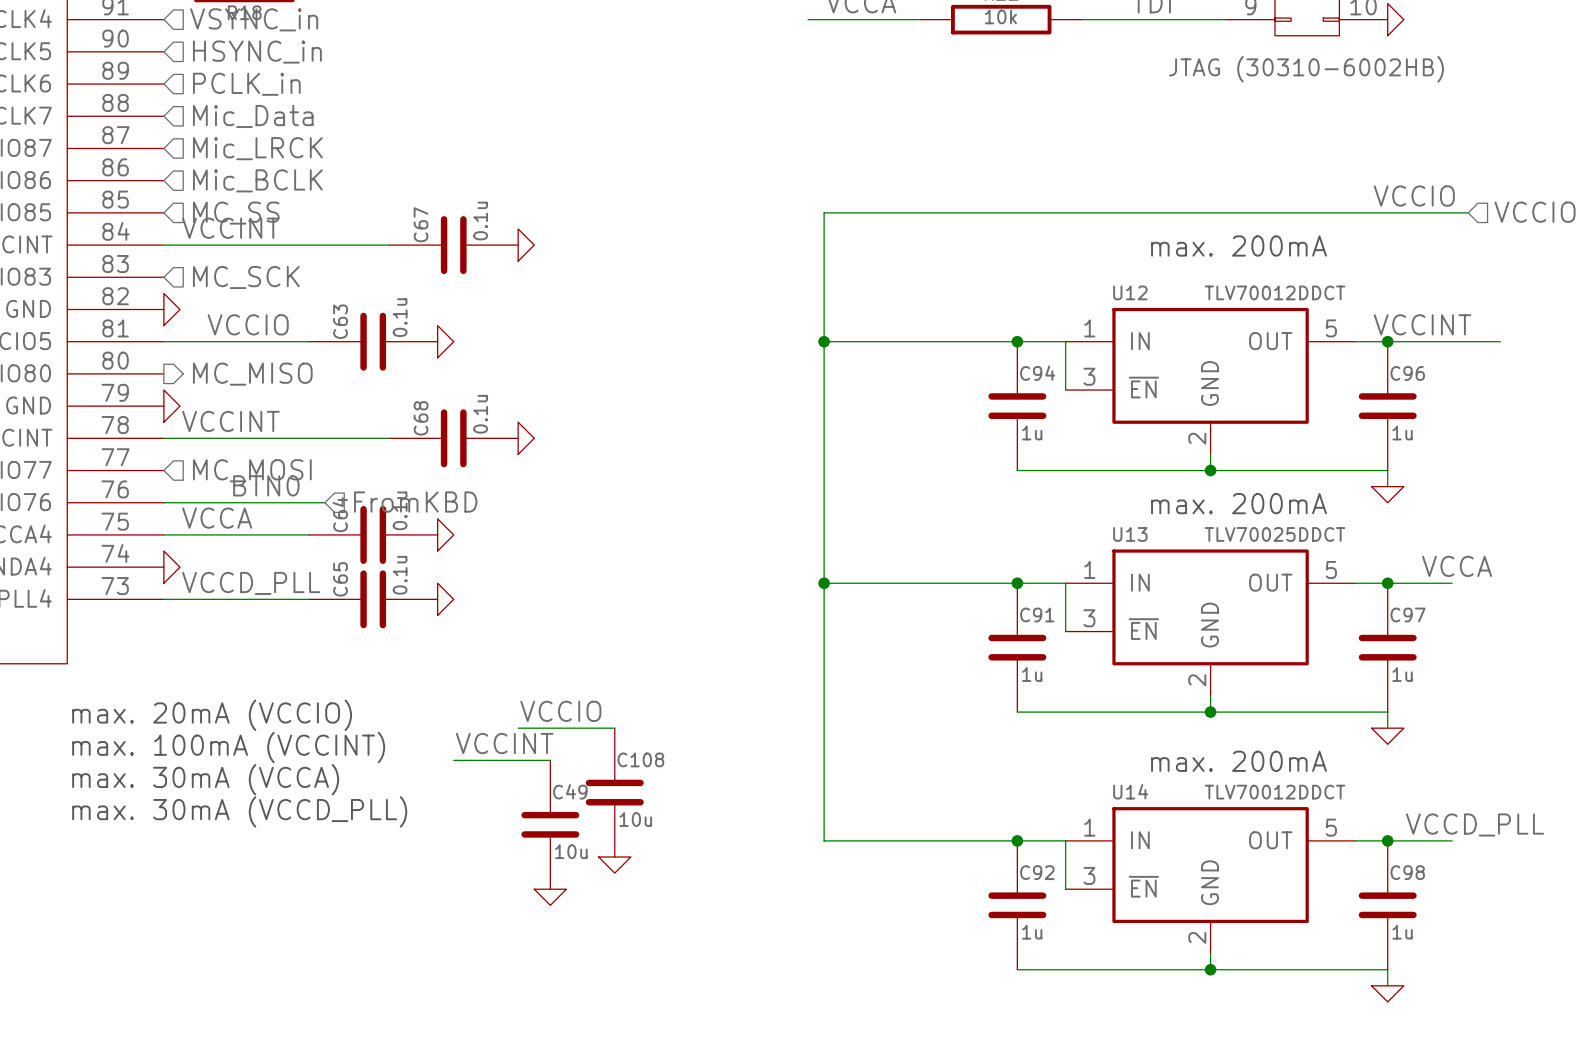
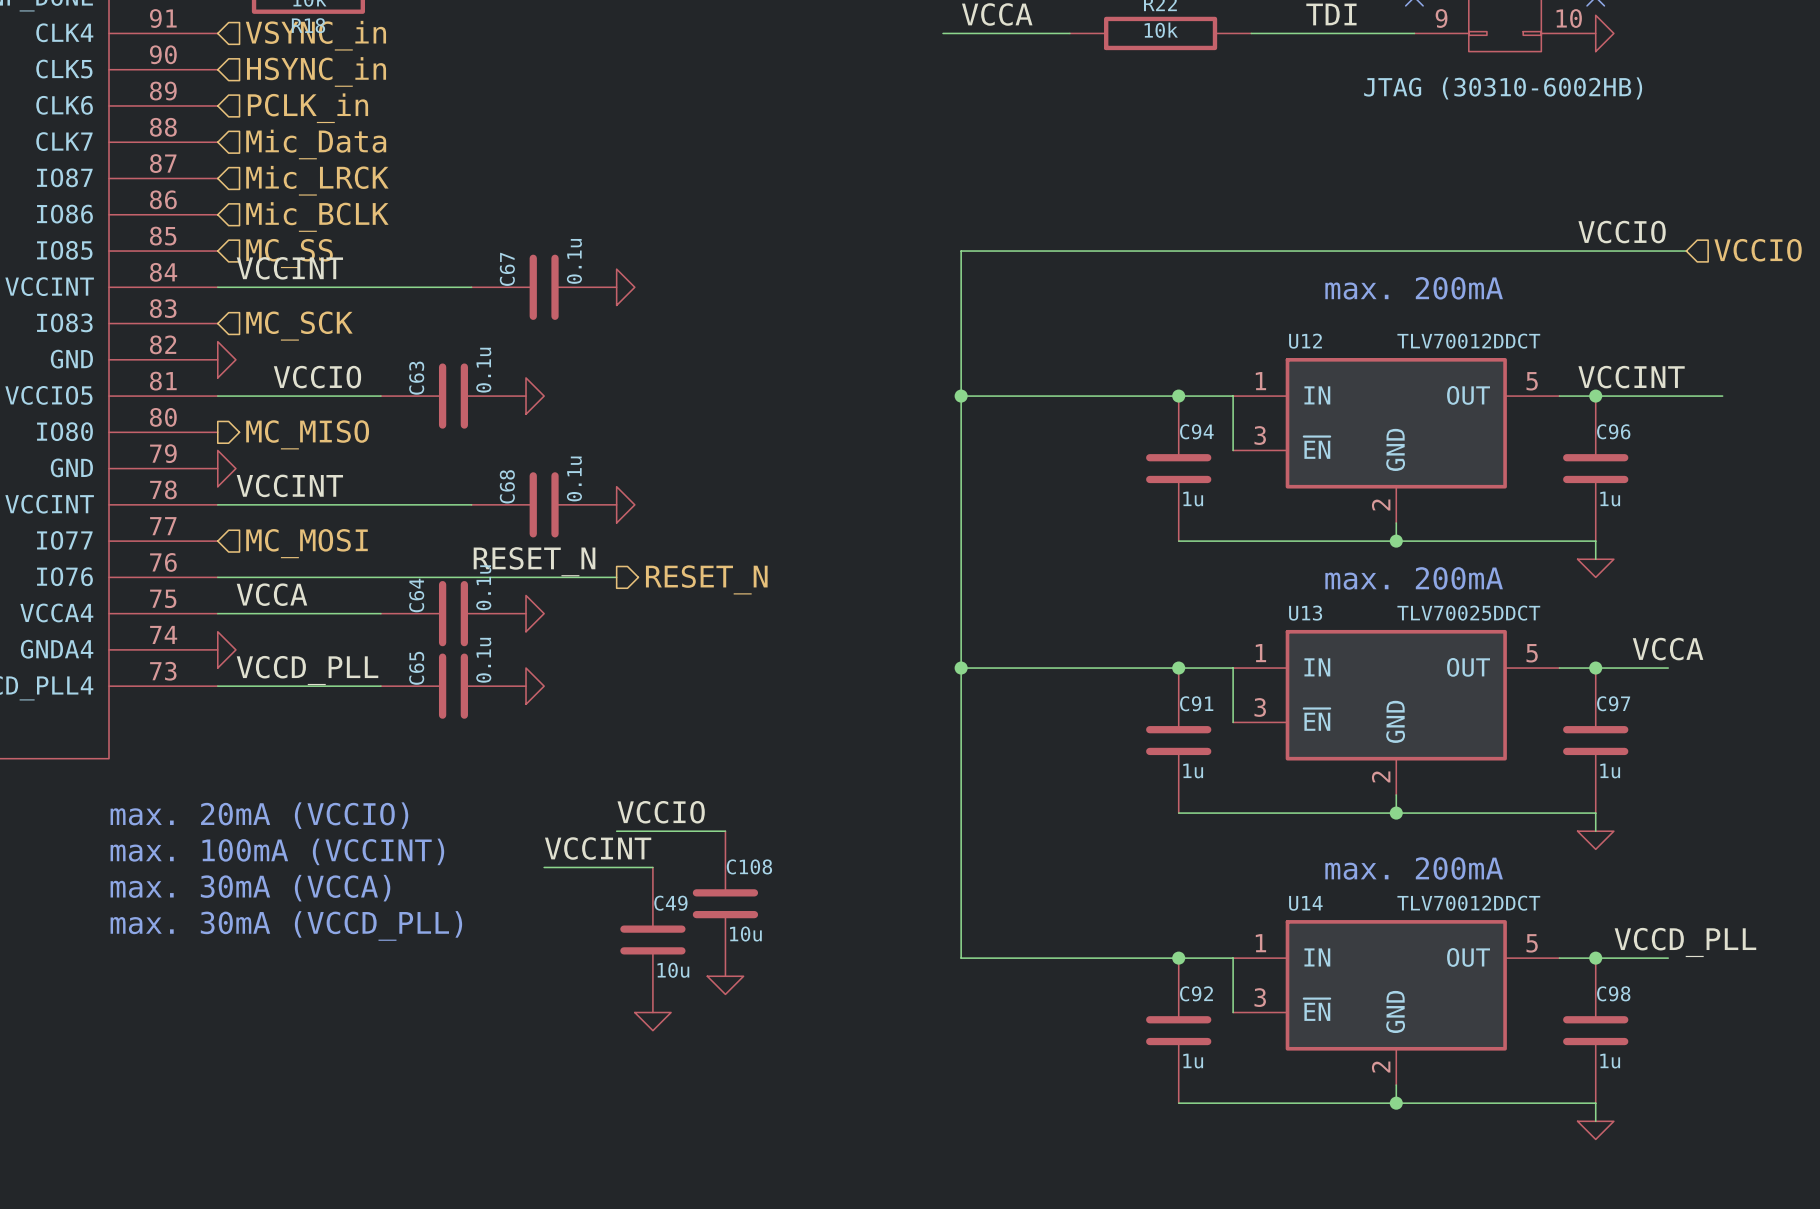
label: BTN0 (266, 485) -> none
label: none -> RESET_N (534, 561)
wire: none -> (399, 577) (616, 577)
hierarchical label: FromKBD (415, 502) -> none
hierarchical label: none -> RESET_N (706, 579)

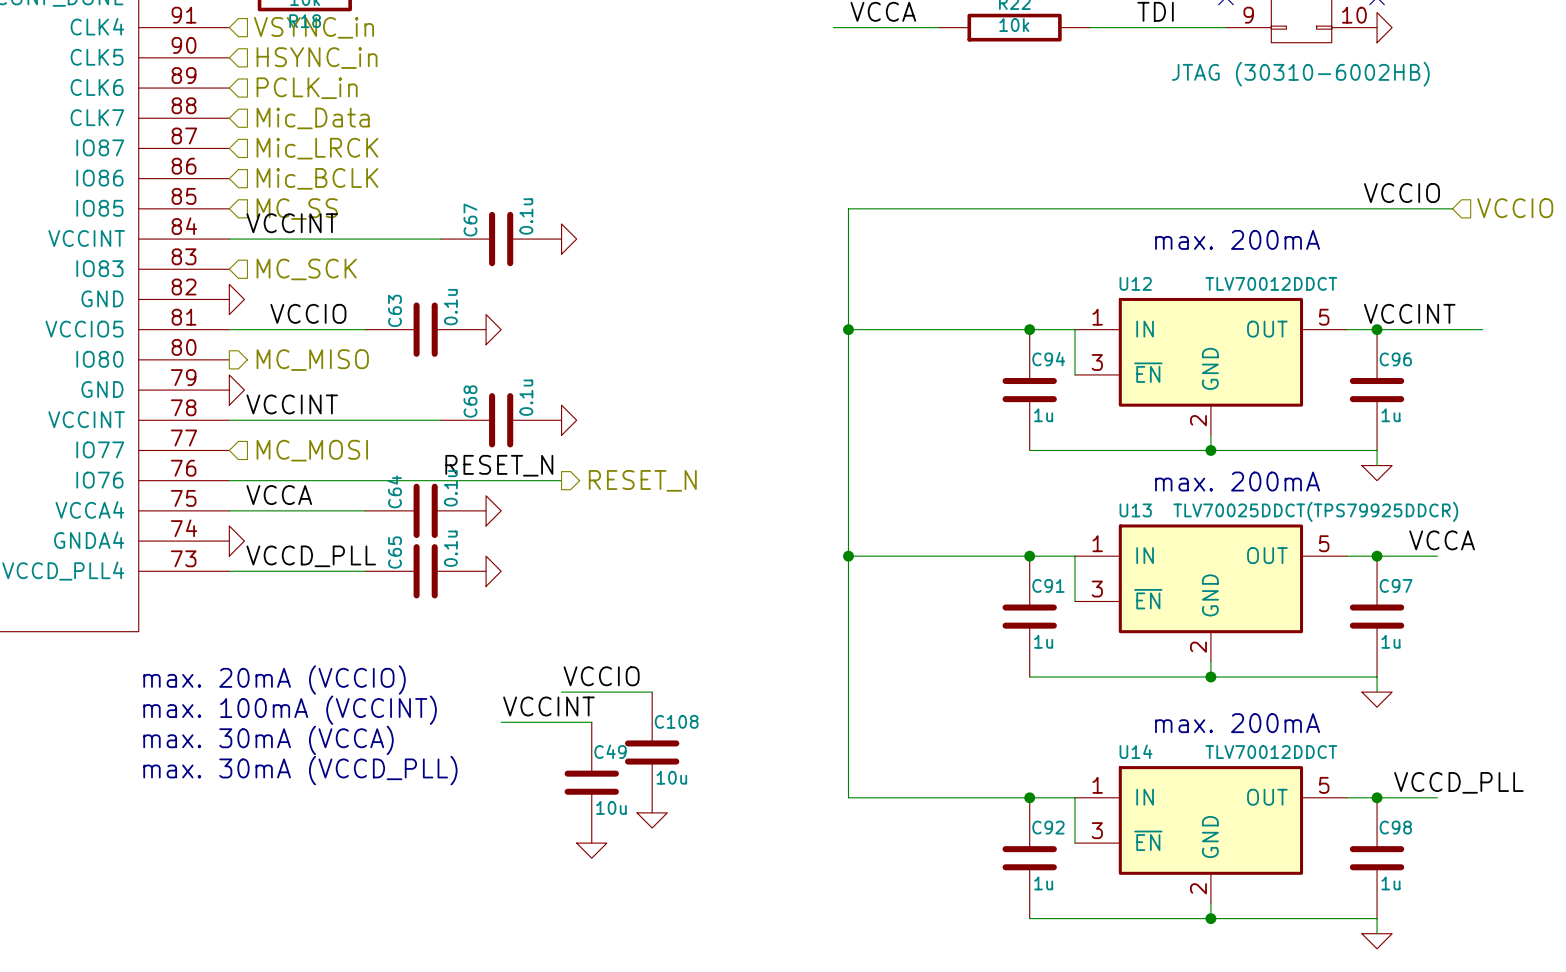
U13 value: TLV70025DDCT (1468, 613) -> TLV70025DDCT(TPS79925DDCR) (1315, 511)

